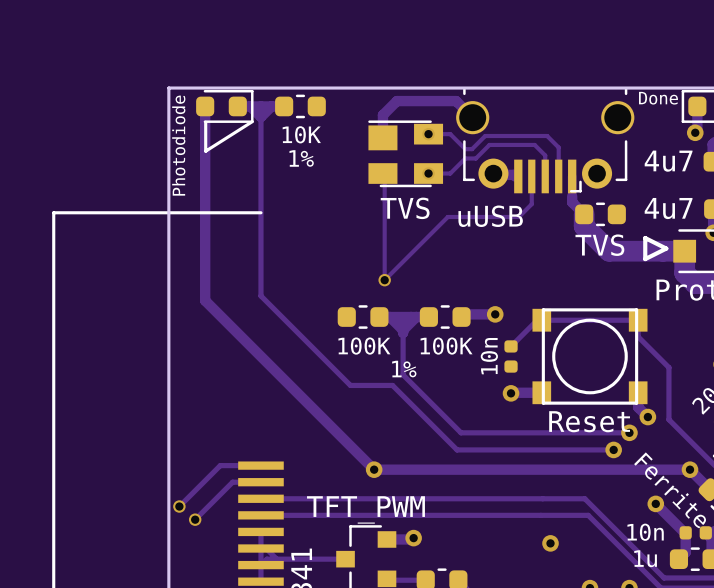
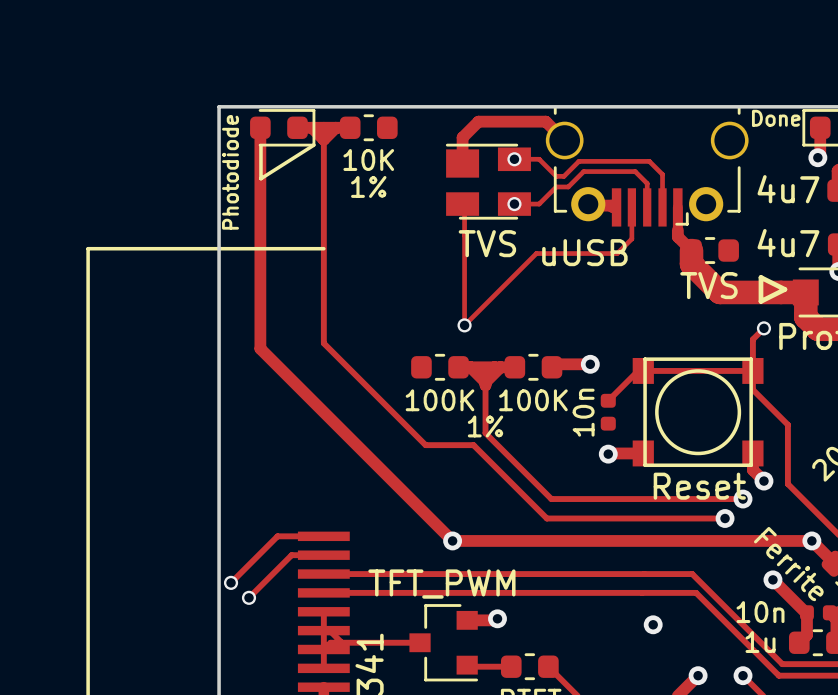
track: none -> (763, 328) (752, 339) (752, 370)
via: none -> (763, 328)

